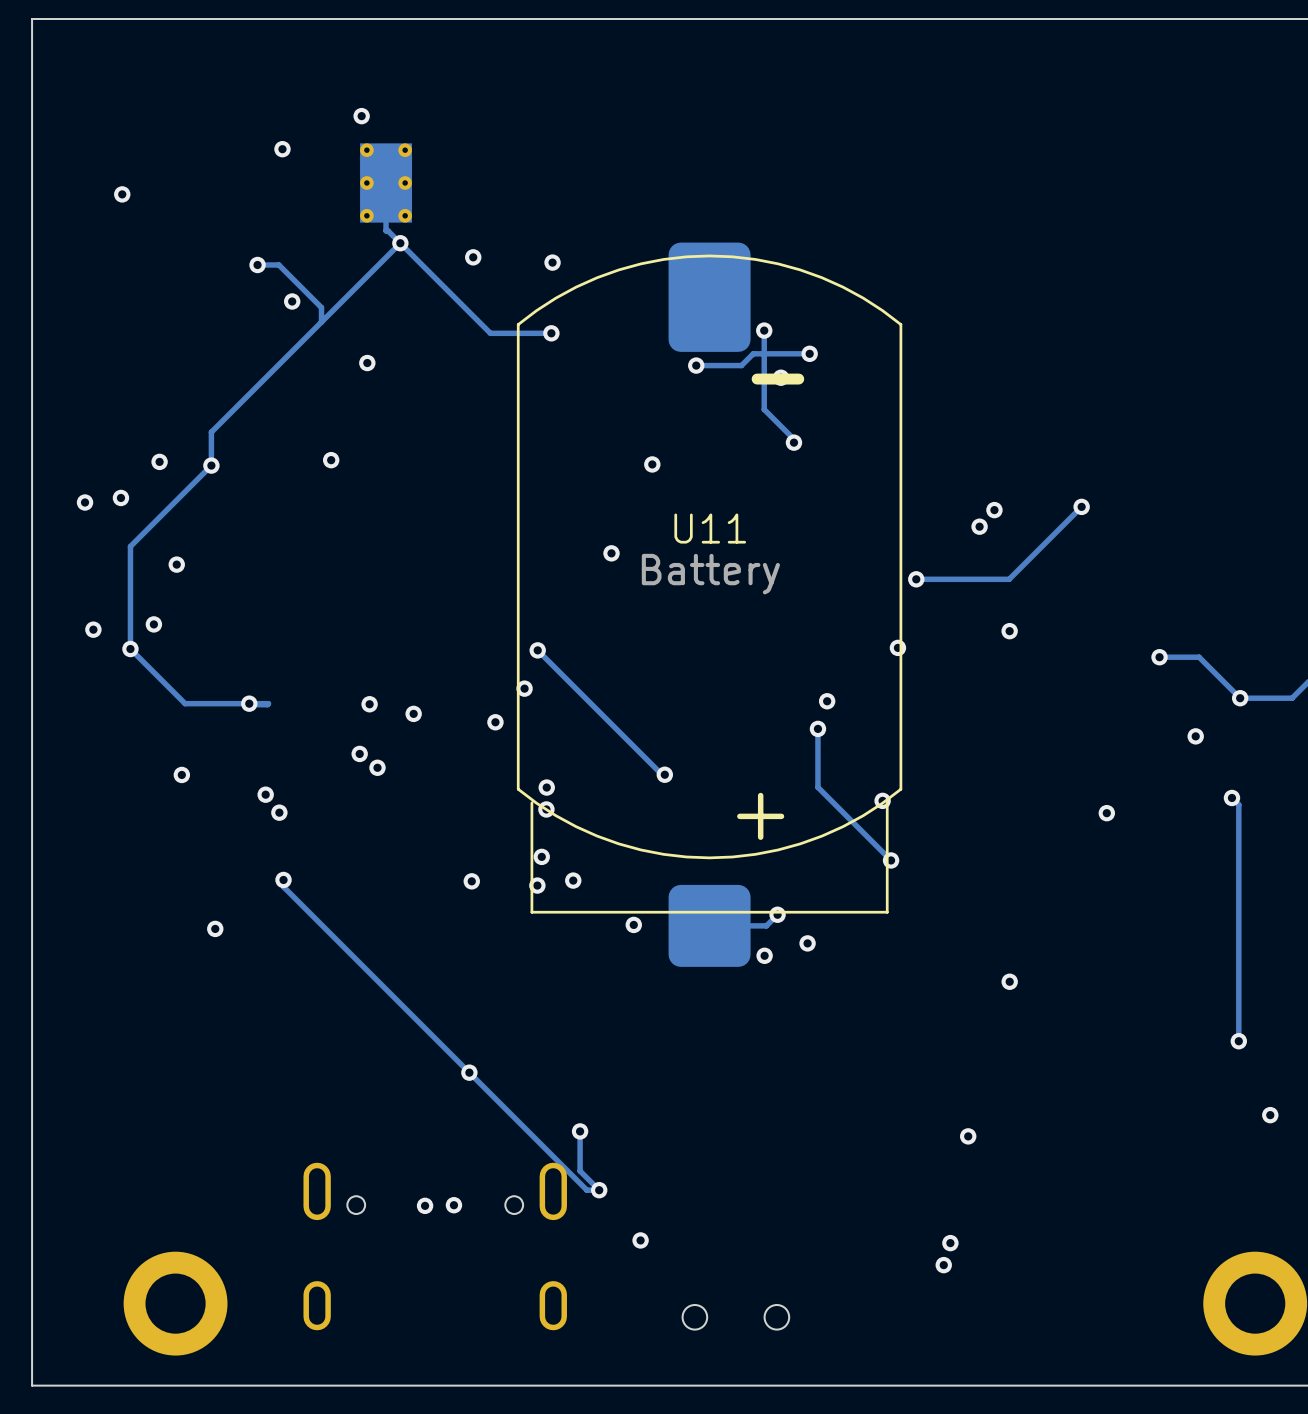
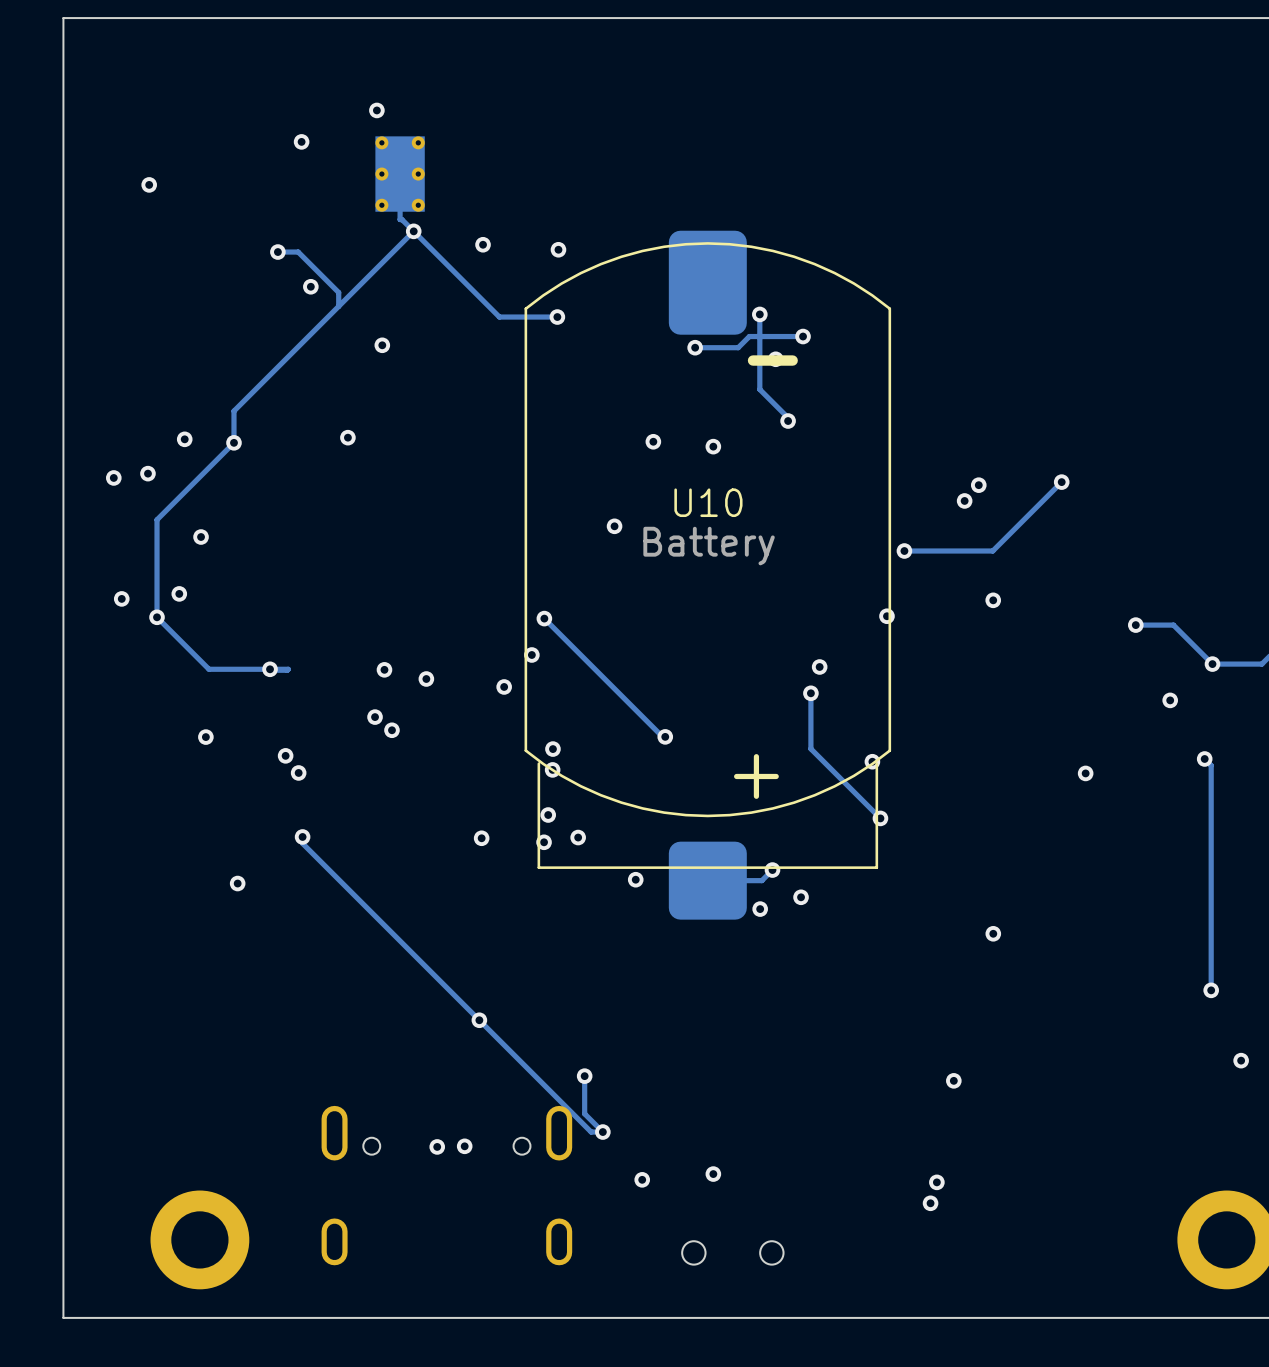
via: none -> (713, 446)
U11 name: U11 (710, 528) -> U10 (708, 502)
via: none -> (713, 1174)

